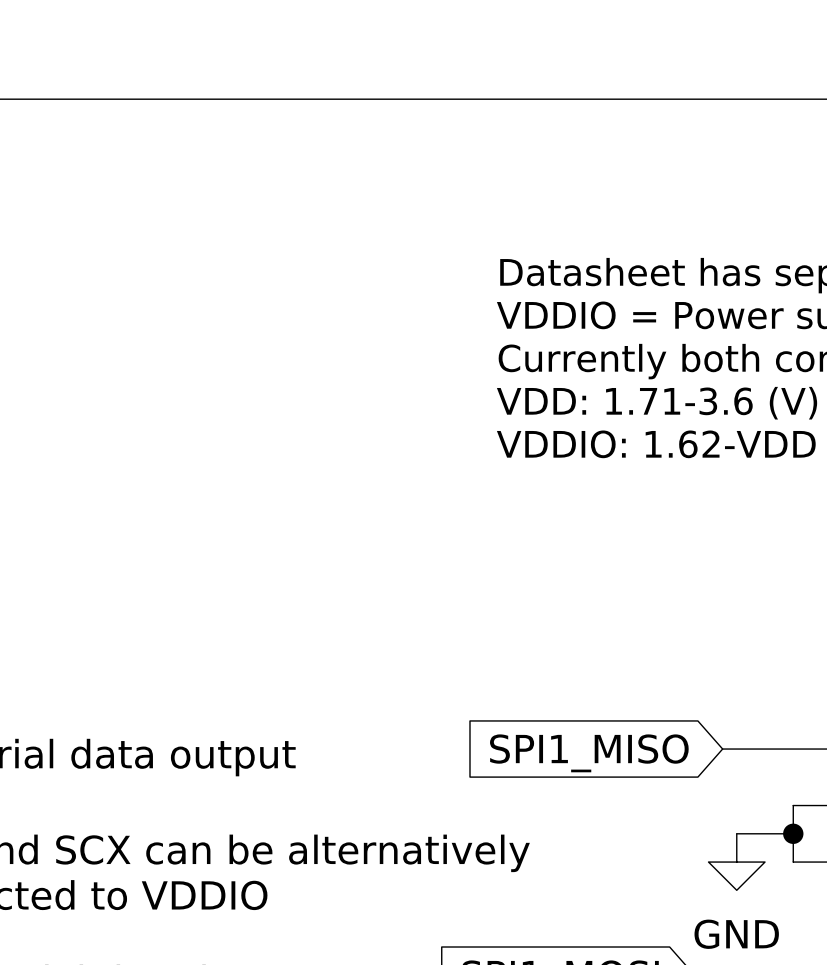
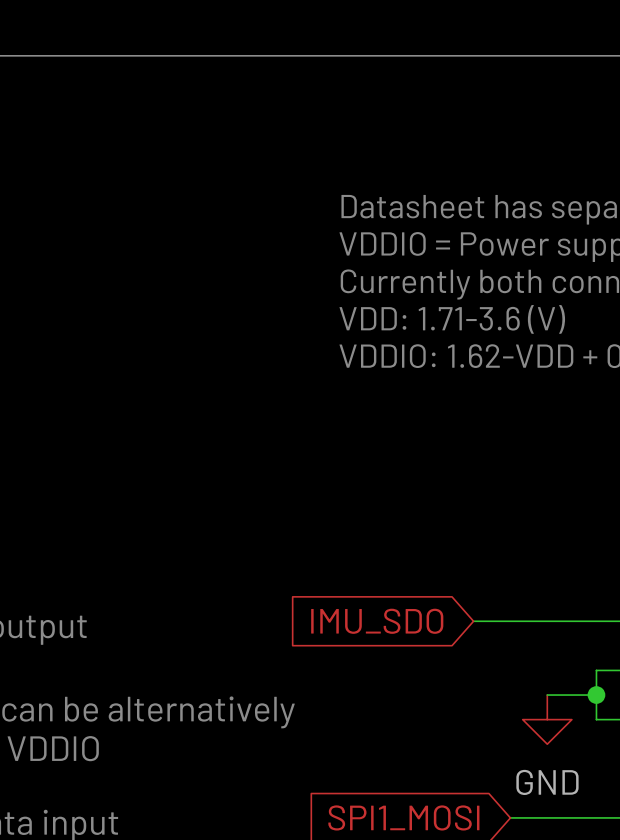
wire: none -> (473, 621) (535, 621)
global label: none -> IMU_SDO (377, 621)
global label: SPI1_MISO (589, 753) -> none

